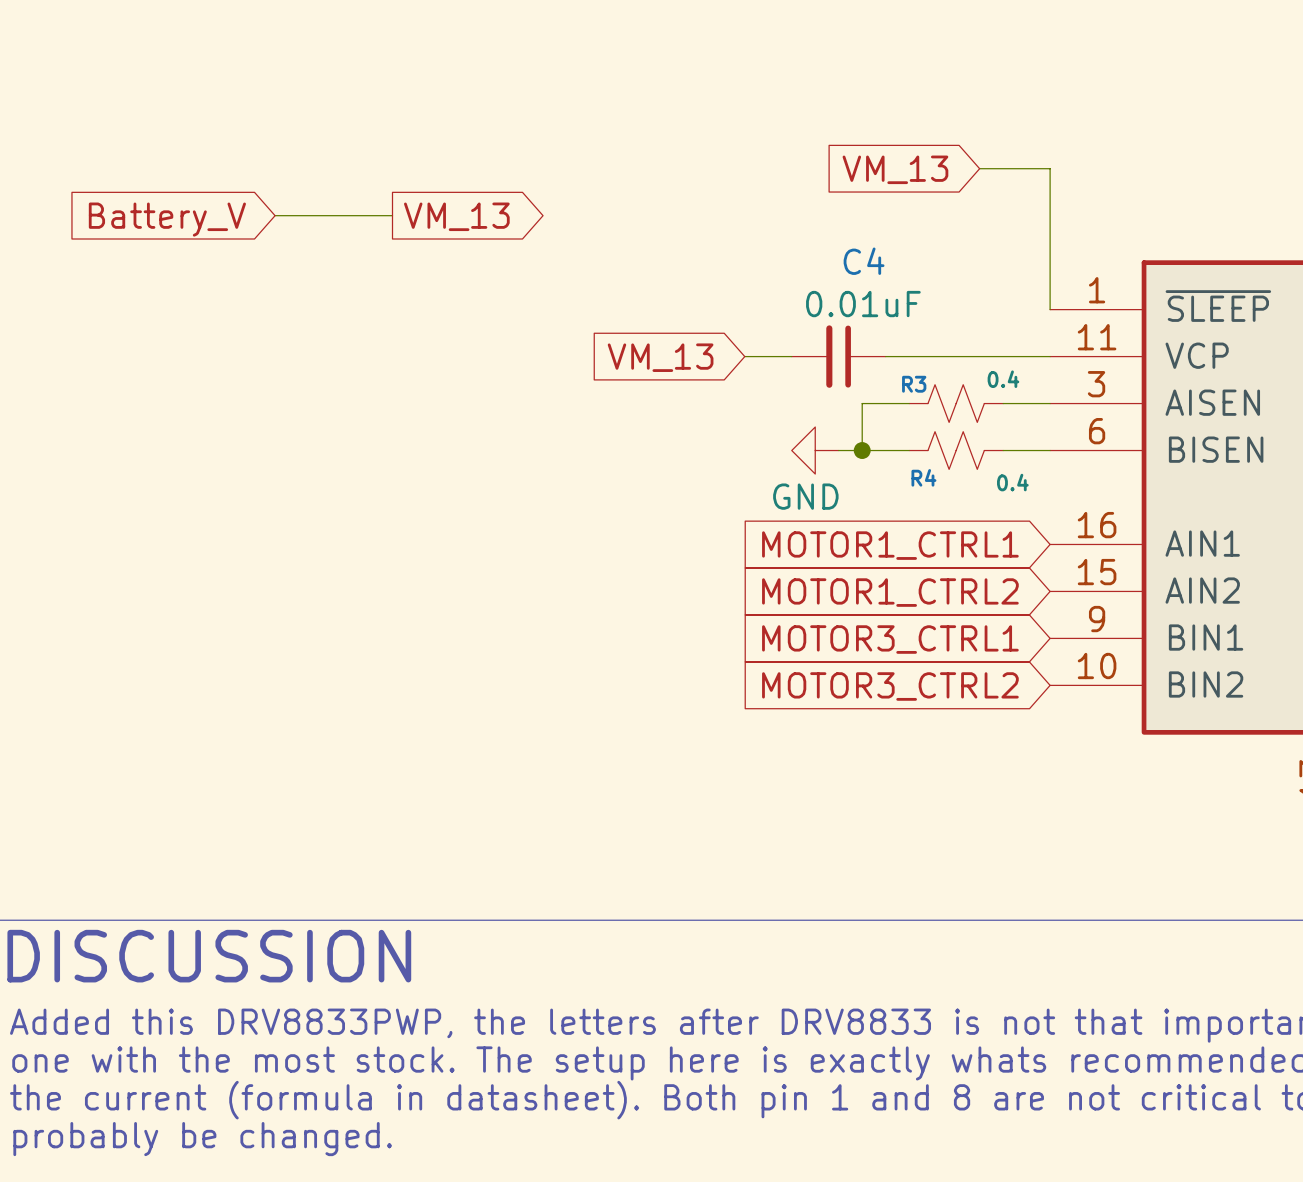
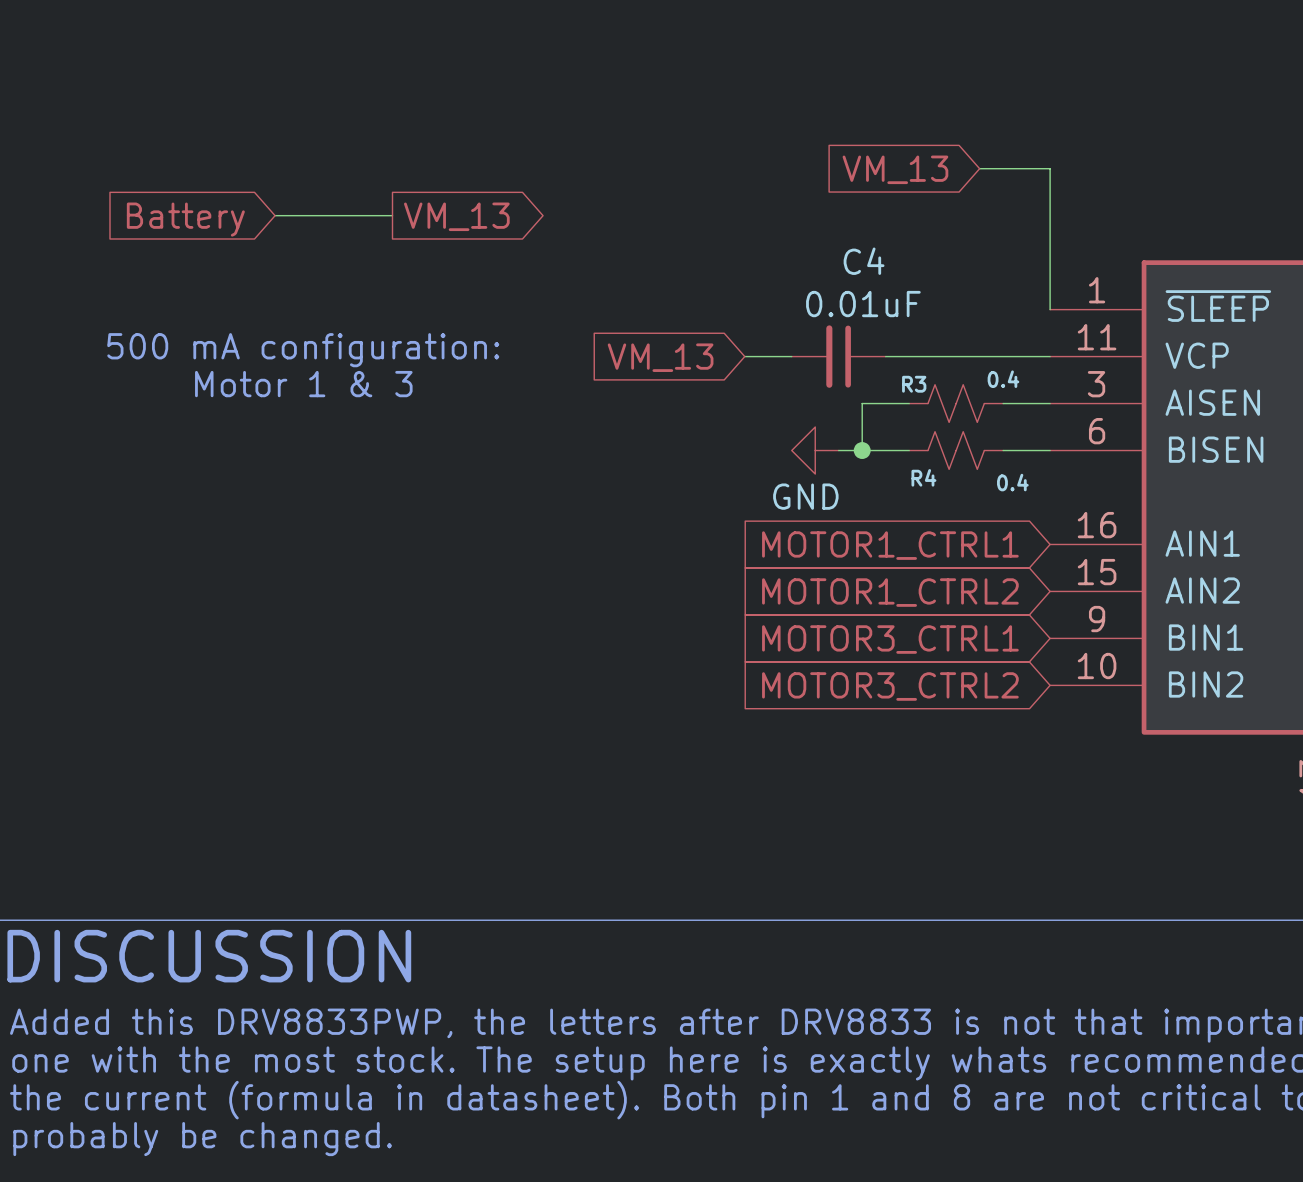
global label: Battery_V (167, 219) -> Battery (185, 219)
text: none -> 500 mA configuration: (303, 350)
text: none -> Motor 1 & 3 (303, 384)

